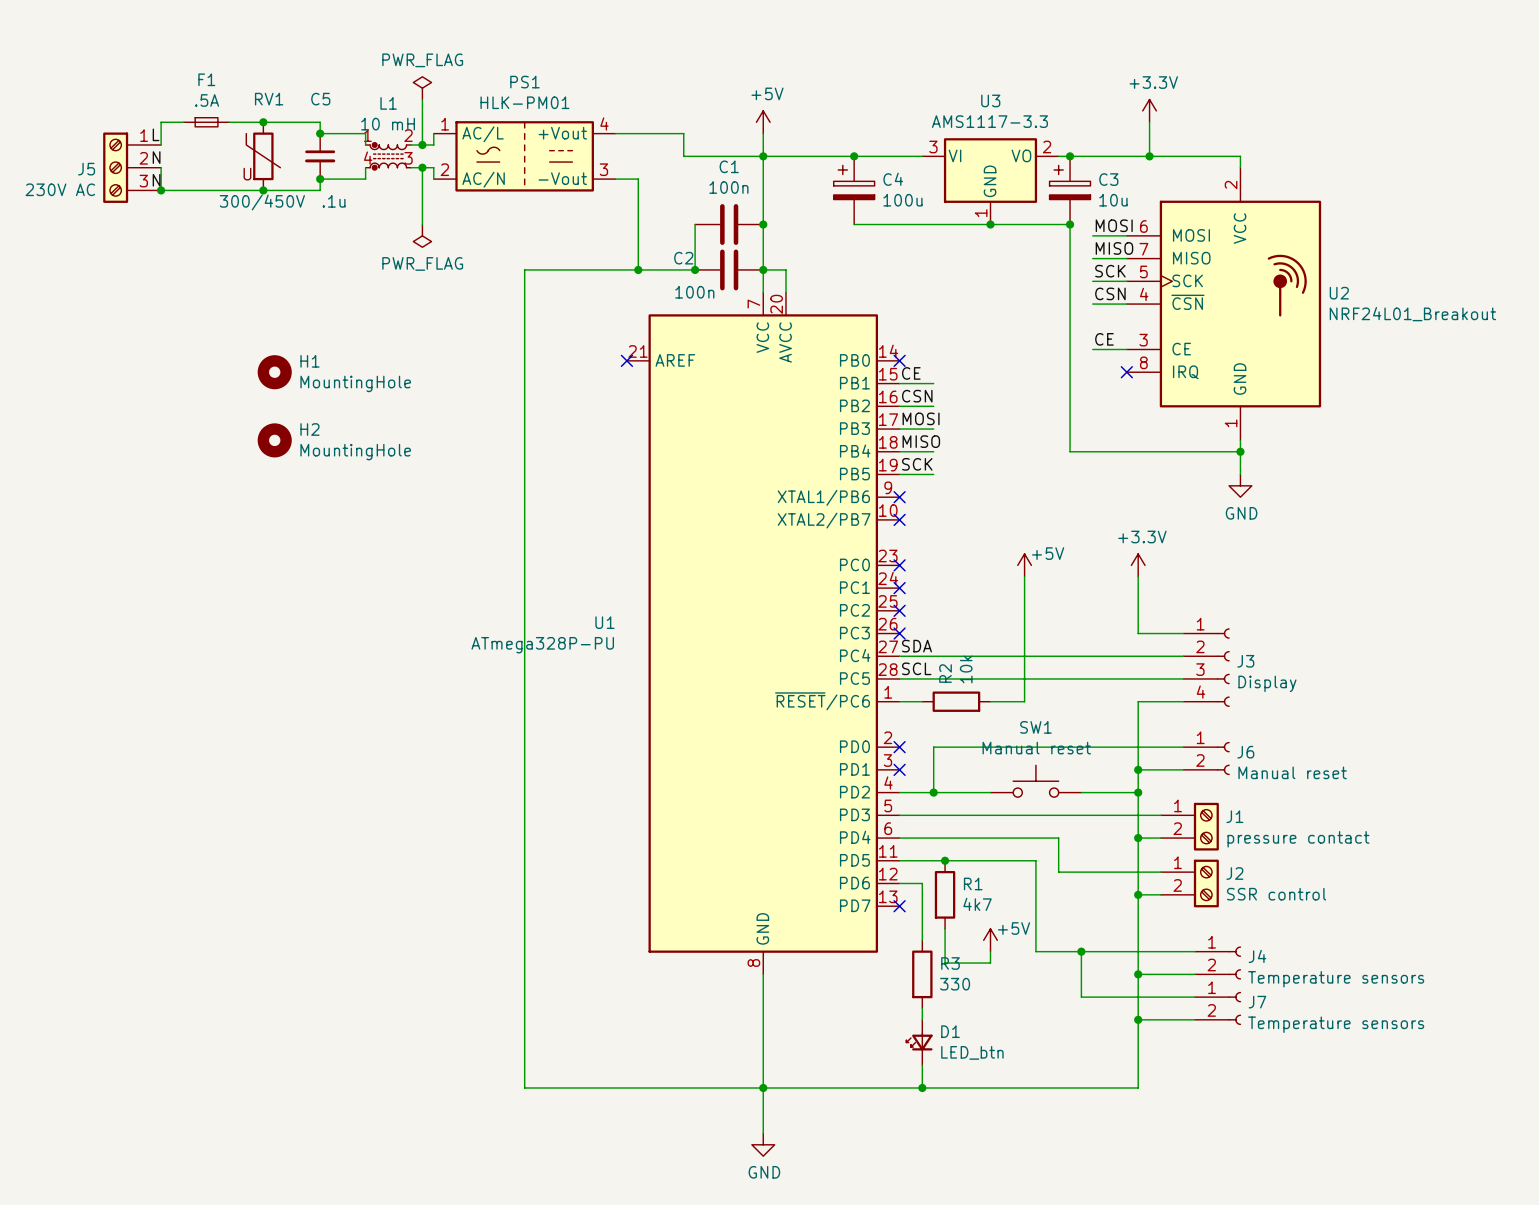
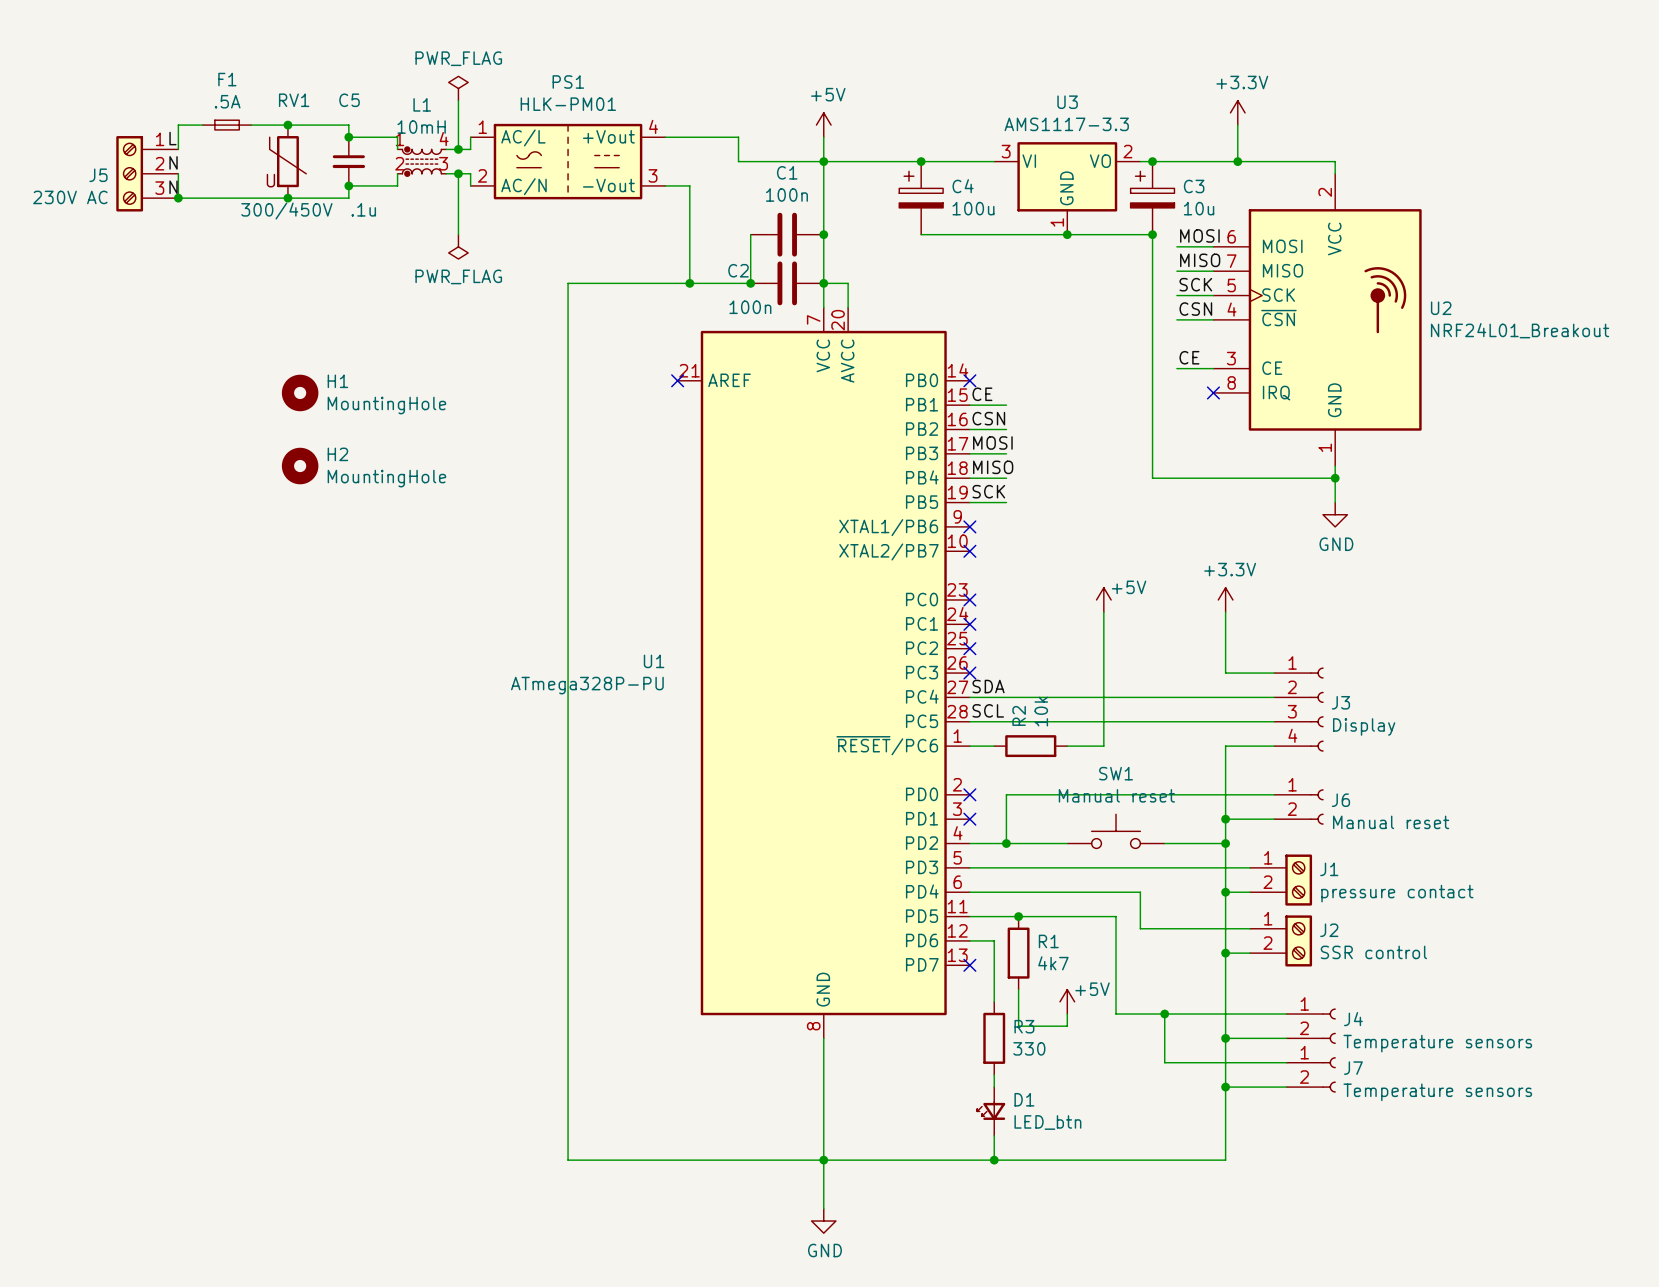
L1 value: 10 mH (388, 124) -> 10mH (421, 127)
L1 pin number: 2 (408, 135) -> 4 (444, 139)
L1 pin number: 4 (368, 158) -> 2 (399, 163)

